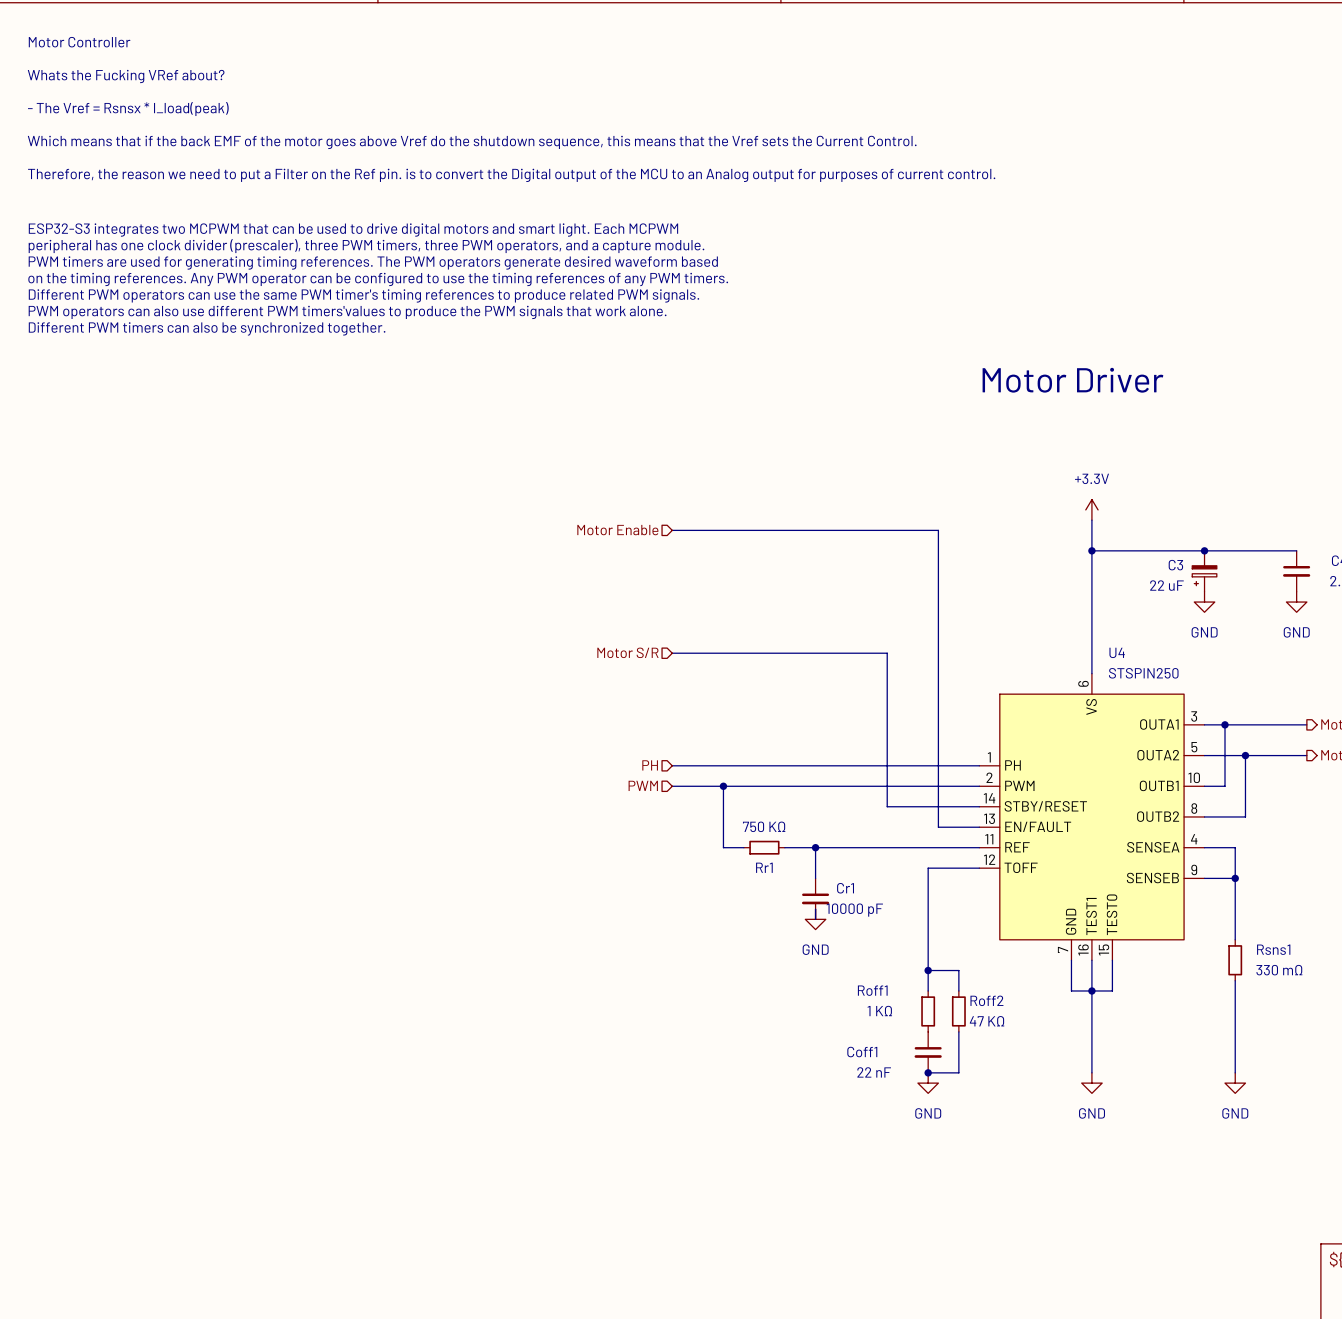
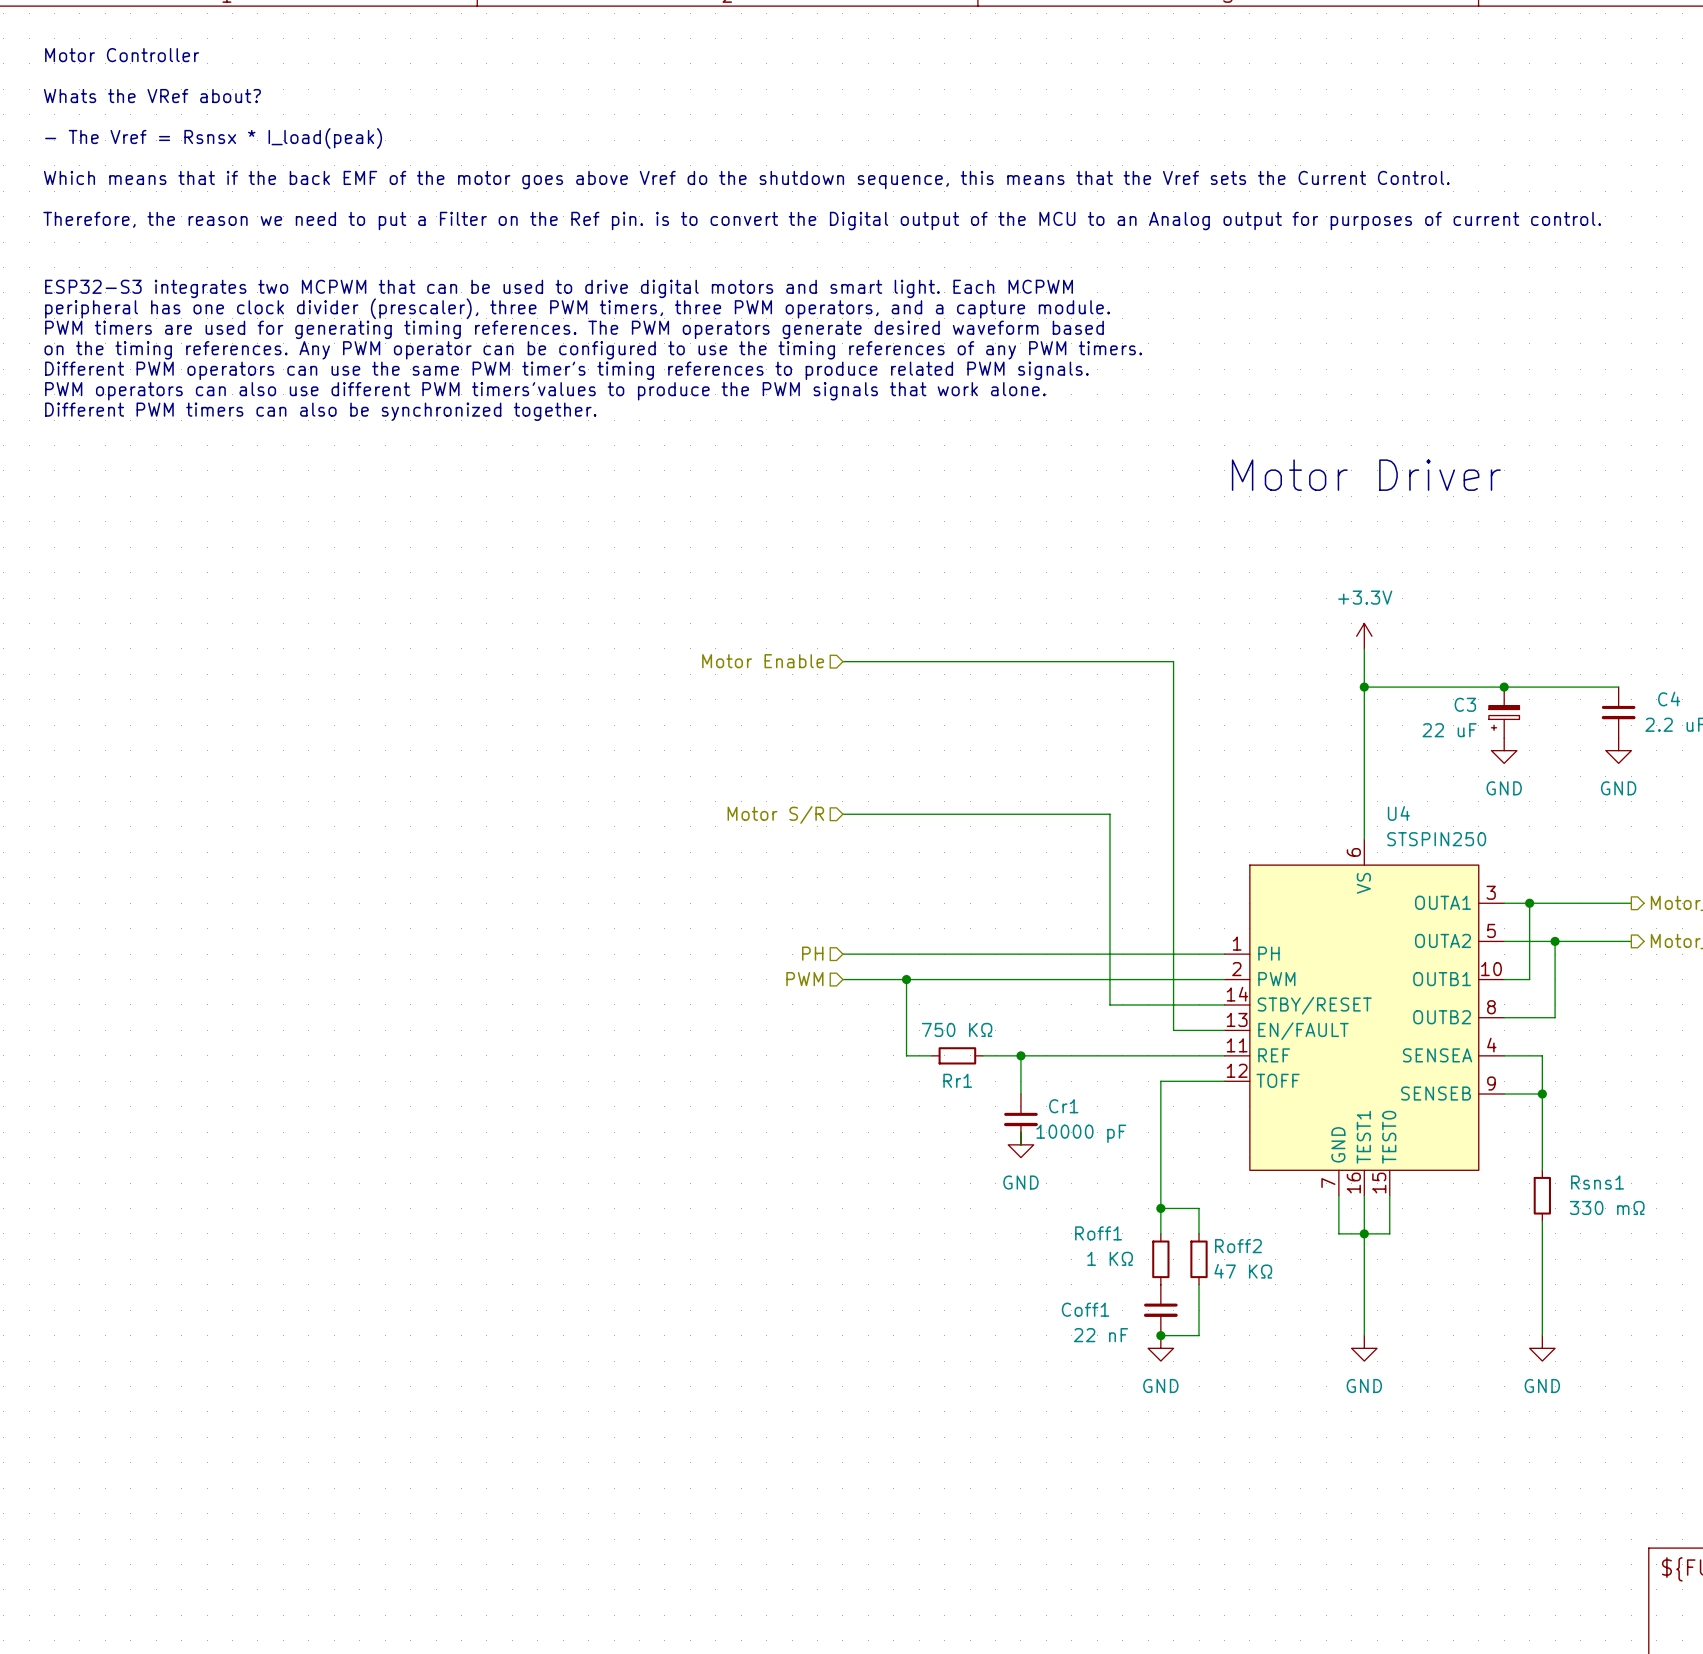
text: Whats the Fucking VRef about? (126, 76) -> Whats the VRef about? (152, 96)

